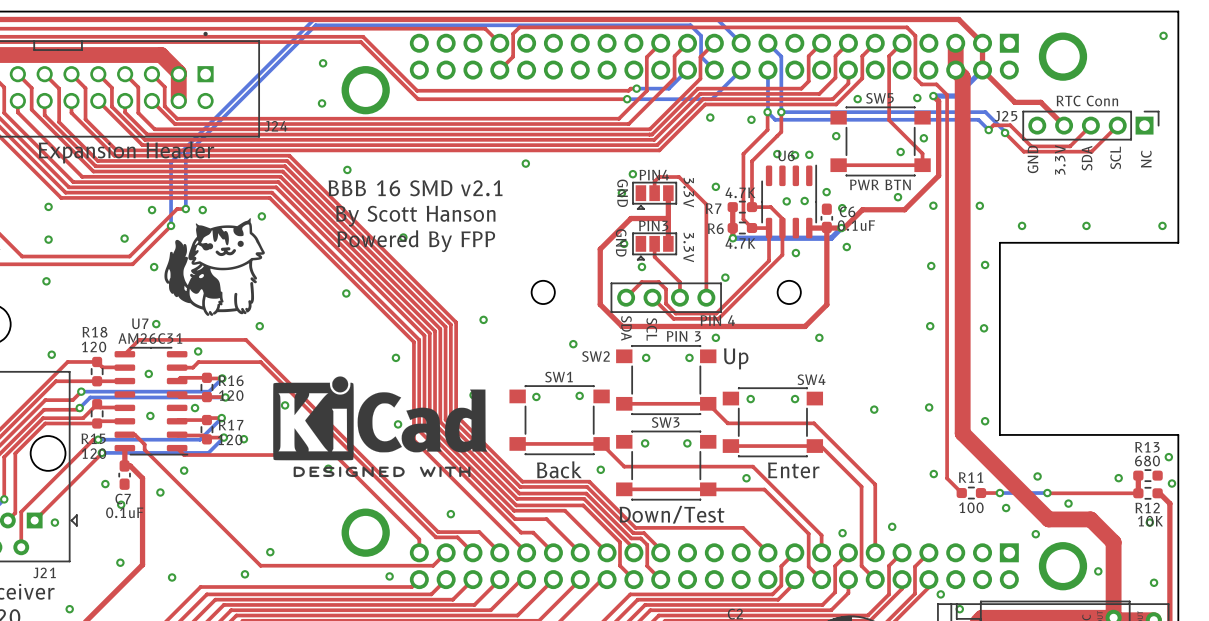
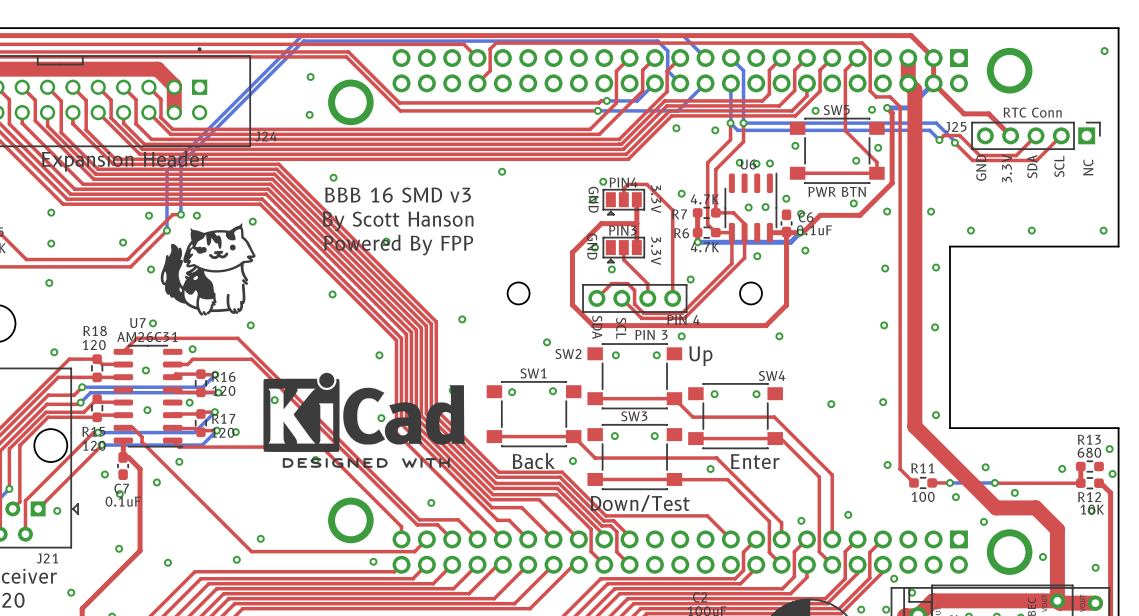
text: BBB 16 SMD v2.1 (415, 188) -> BBB 16 SMD v3 (397, 195)

